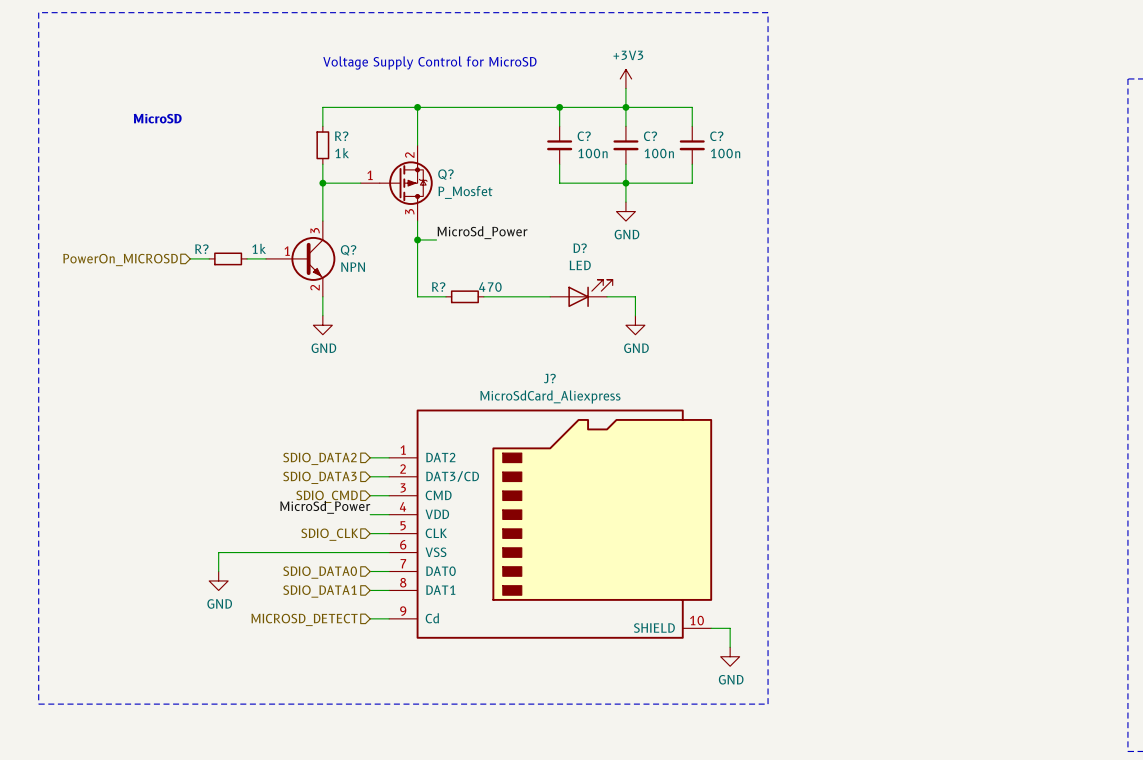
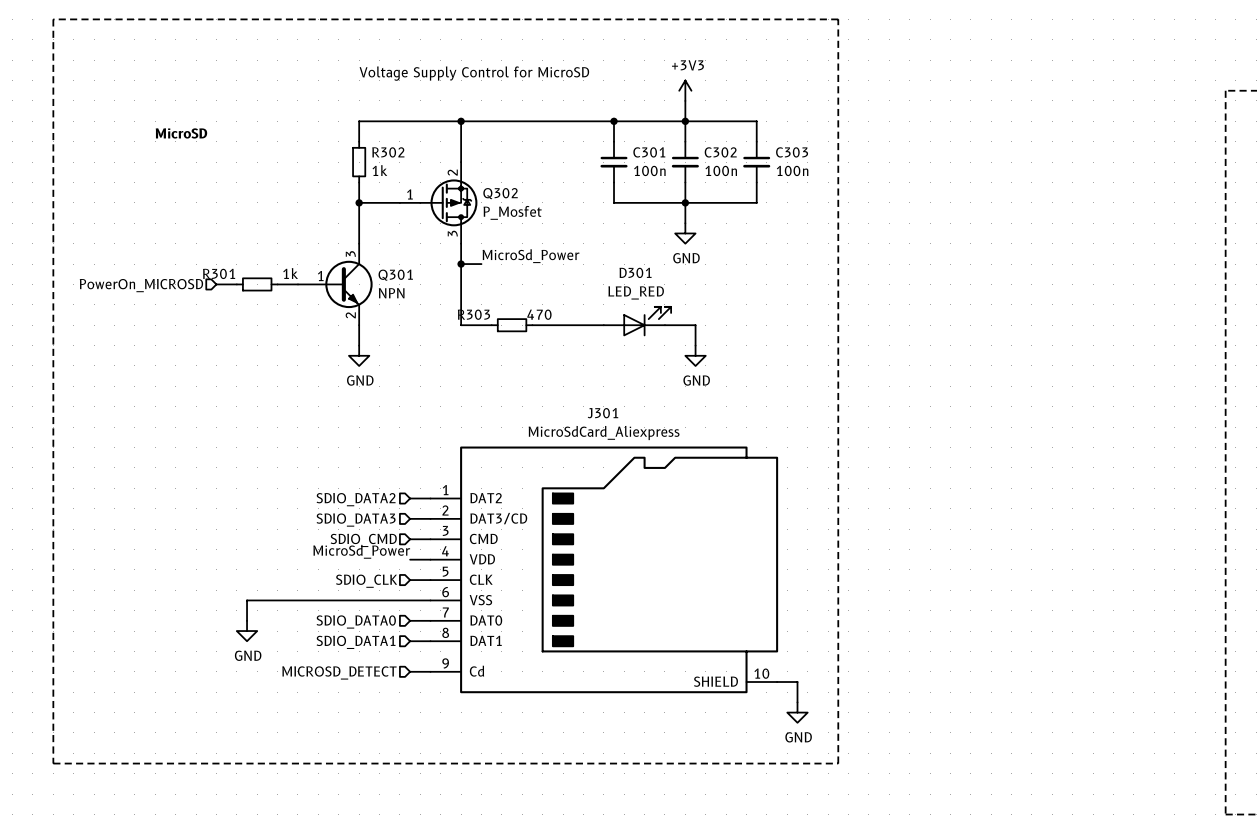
R? name: R? (341, 136) -> R302 (388, 152)
C? name: C? (584, 136) -> C301 (649, 152)
C? name: C? (650, 136) -> C302 (720, 152)
C? name: C? (716, 136) -> C303 (792, 152)
Q? name: Q? (445, 174) -> Q302 (500, 193)
D? name: D? (580, 248) -> D301 (635, 272)
R? name: R? (201, 249) -> R301 (219, 273)
Q? name: Q? (348, 250) -> Q301 (395, 275)
D? value: LED (580, 265) -> LED_RED (636, 292)
R? name: R? (438, 287) -> R303 (473, 314)
J? name: J? (549, 378) -> J301 (602, 413)

